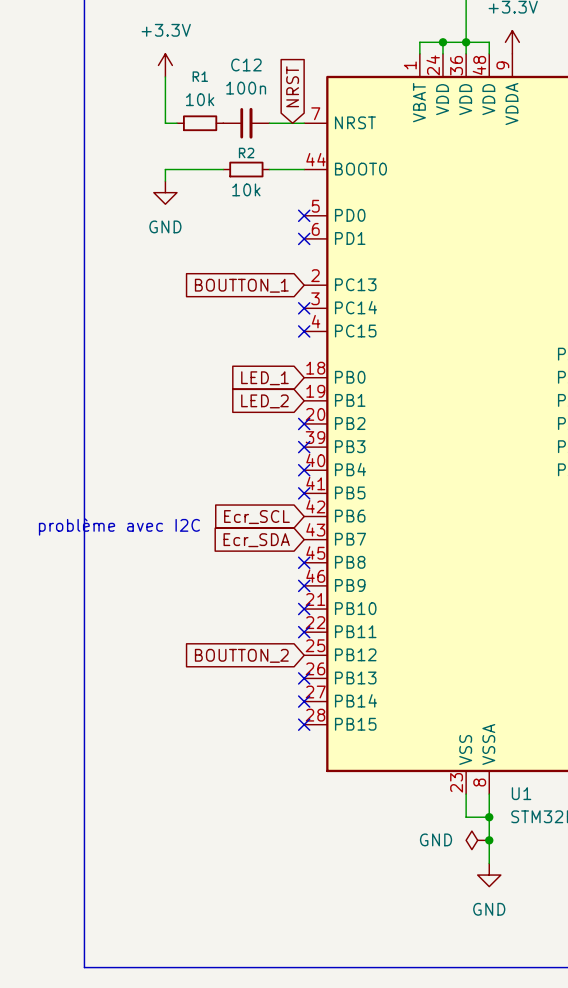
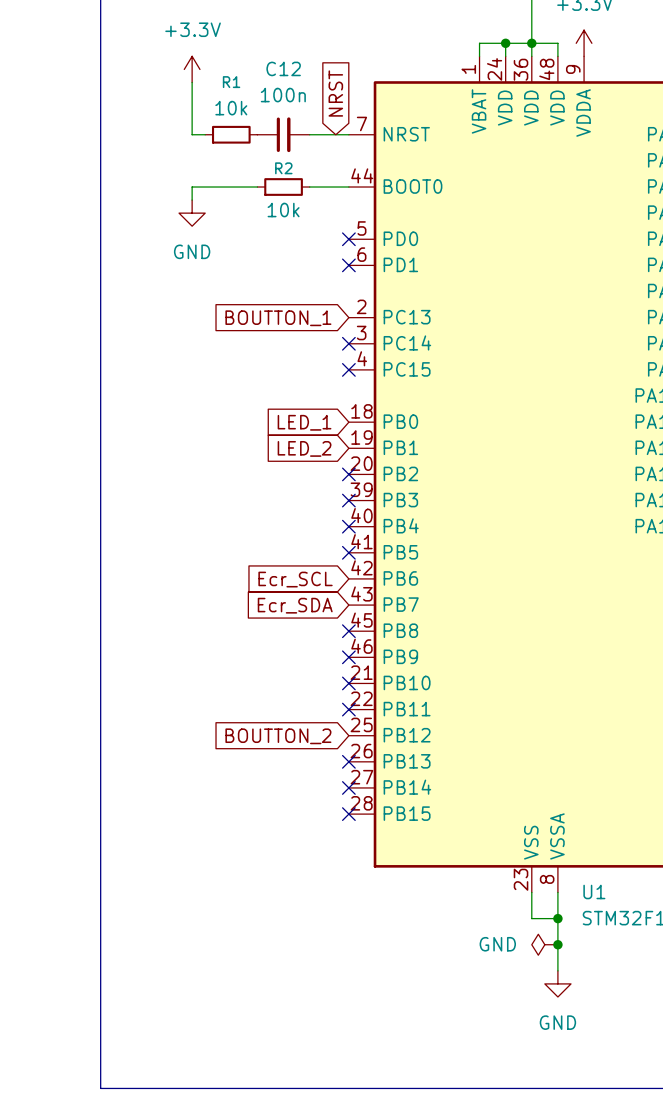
text: problème avec I2C (119, 527) -> none

